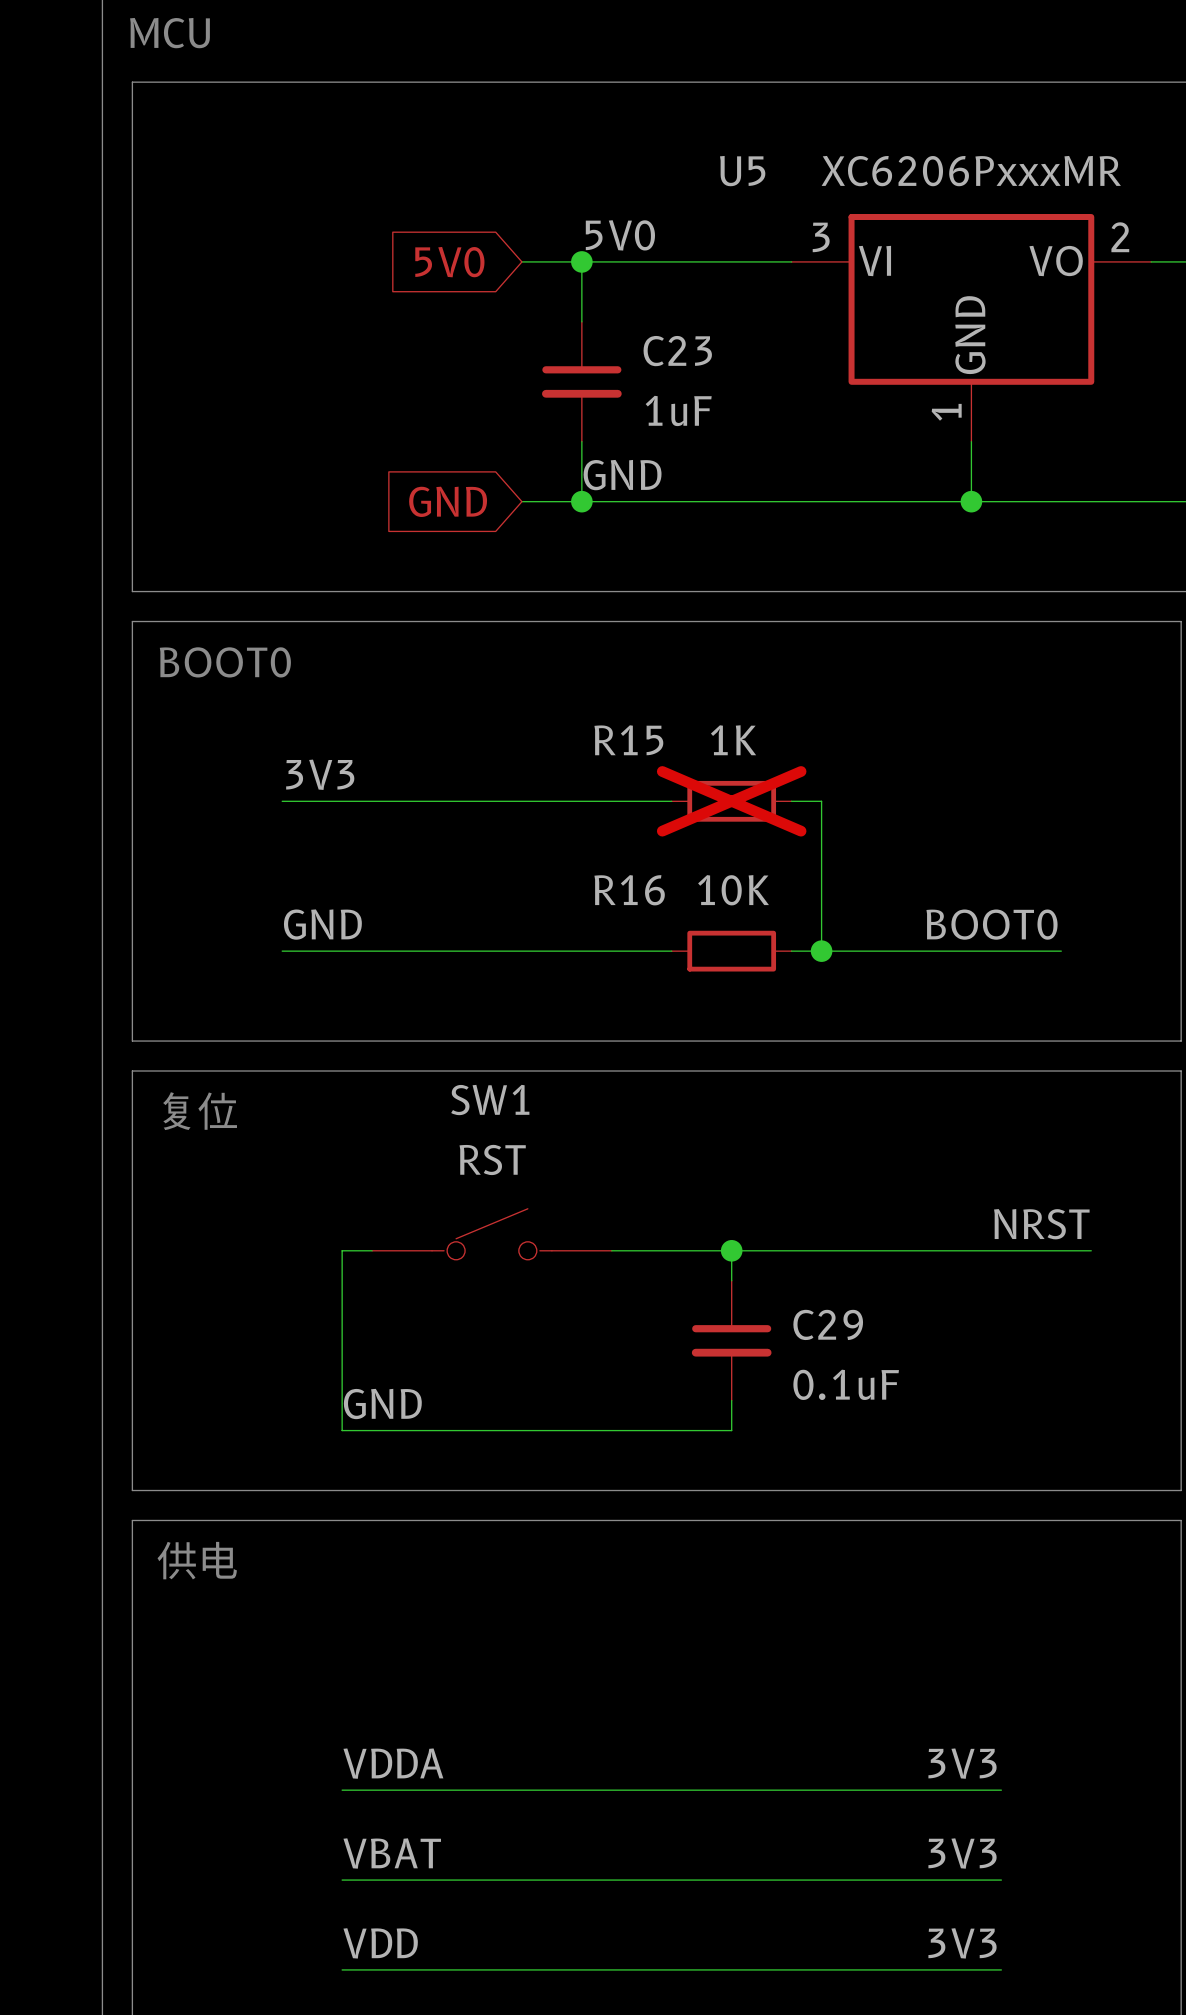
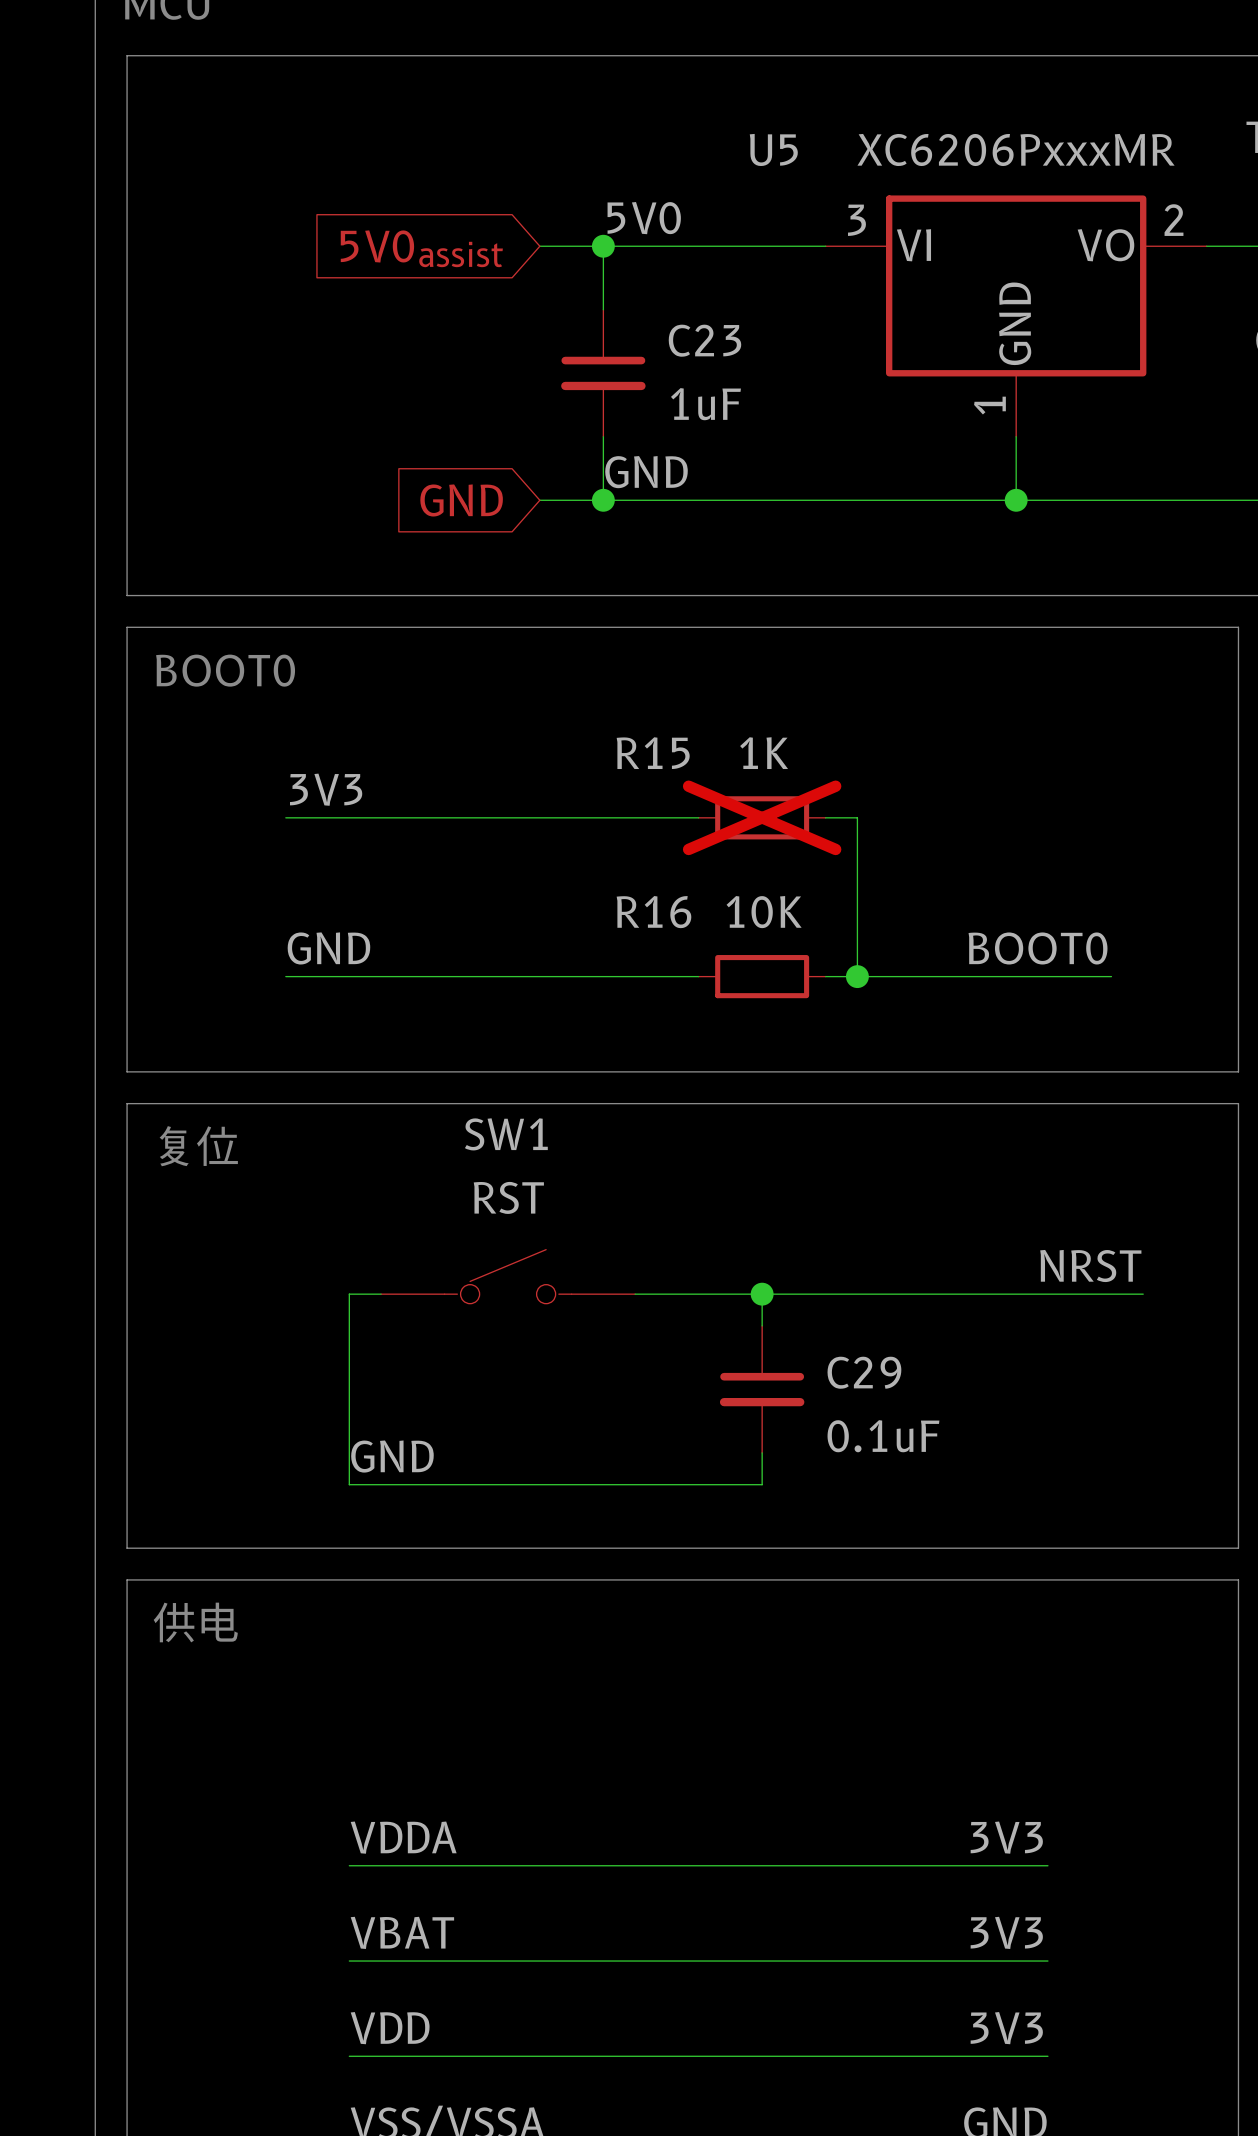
global label: 5V0 (449, 262) -> 5V0assist (421, 248)

